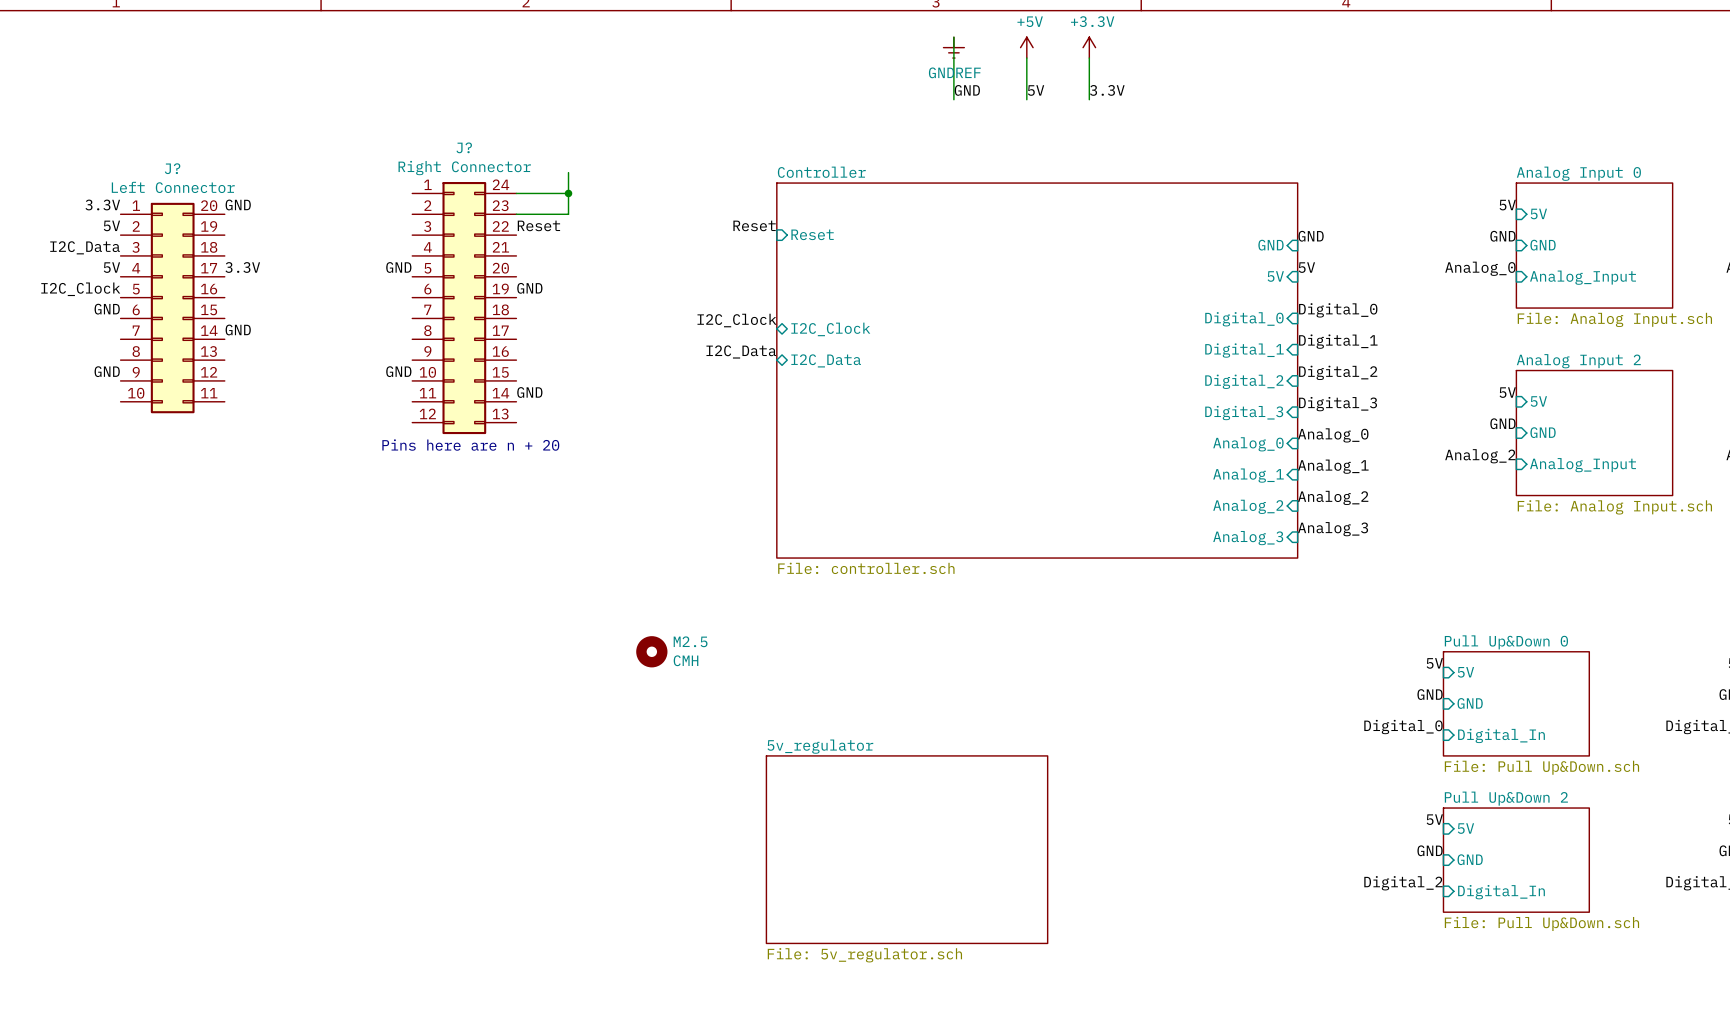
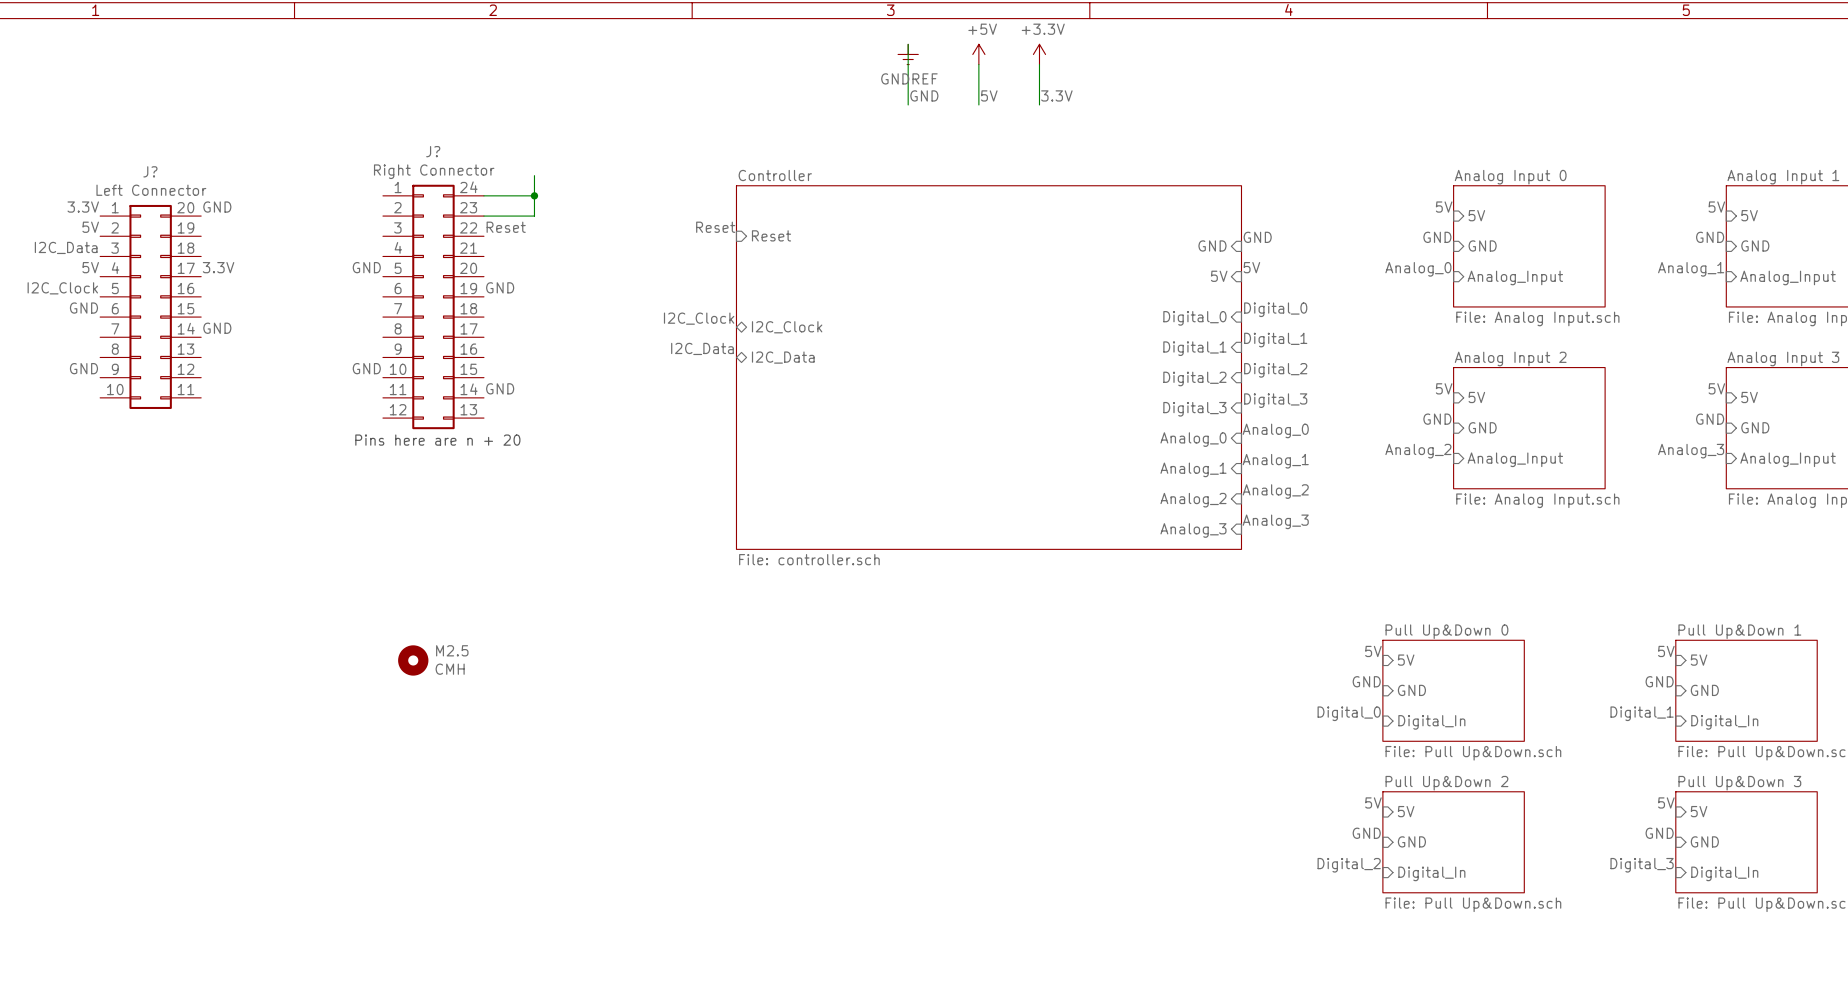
M2.5 position: (651, 651) -> (413, 660)
sheet 5v_regulator: File: 5v_regulator.sch (907, 849) -> none

